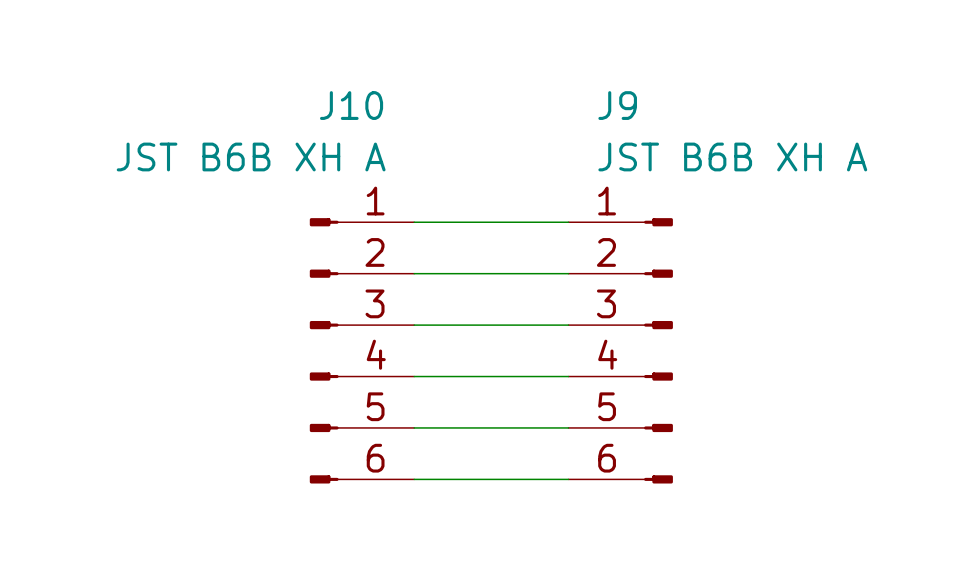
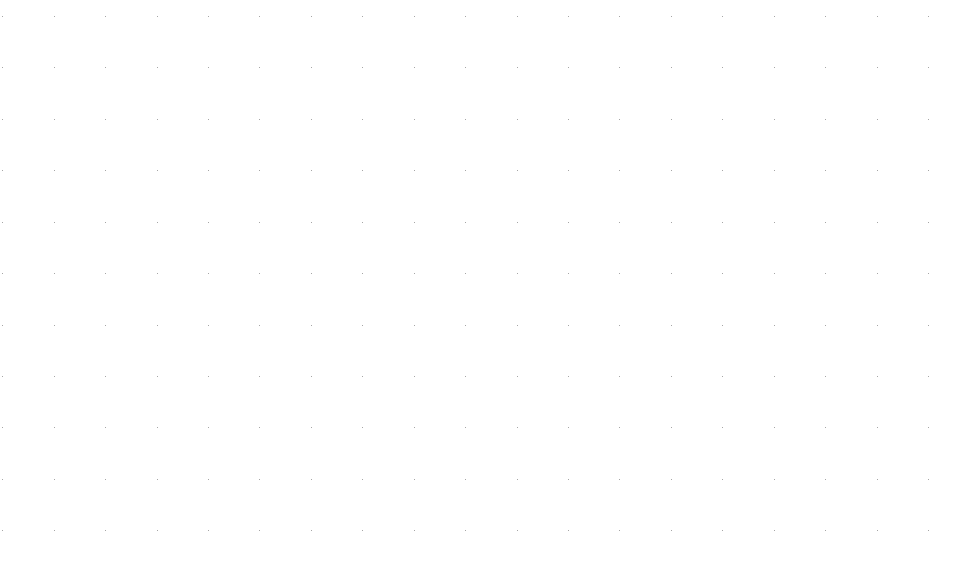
wire: (414, 222) (568, 222) -> none
wire: (414, 273) (568, 273) -> none
wire: (414, 325) (568, 325) -> none
J10: JST B6B XH A (362, 350) -> none
J9: JST B6B XH A (620, 350) -> none
wire: (414, 376) (568, 376) -> none
wire: (414, 427) (568, 427) -> none
wire: (414, 479) (568, 479) -> none

